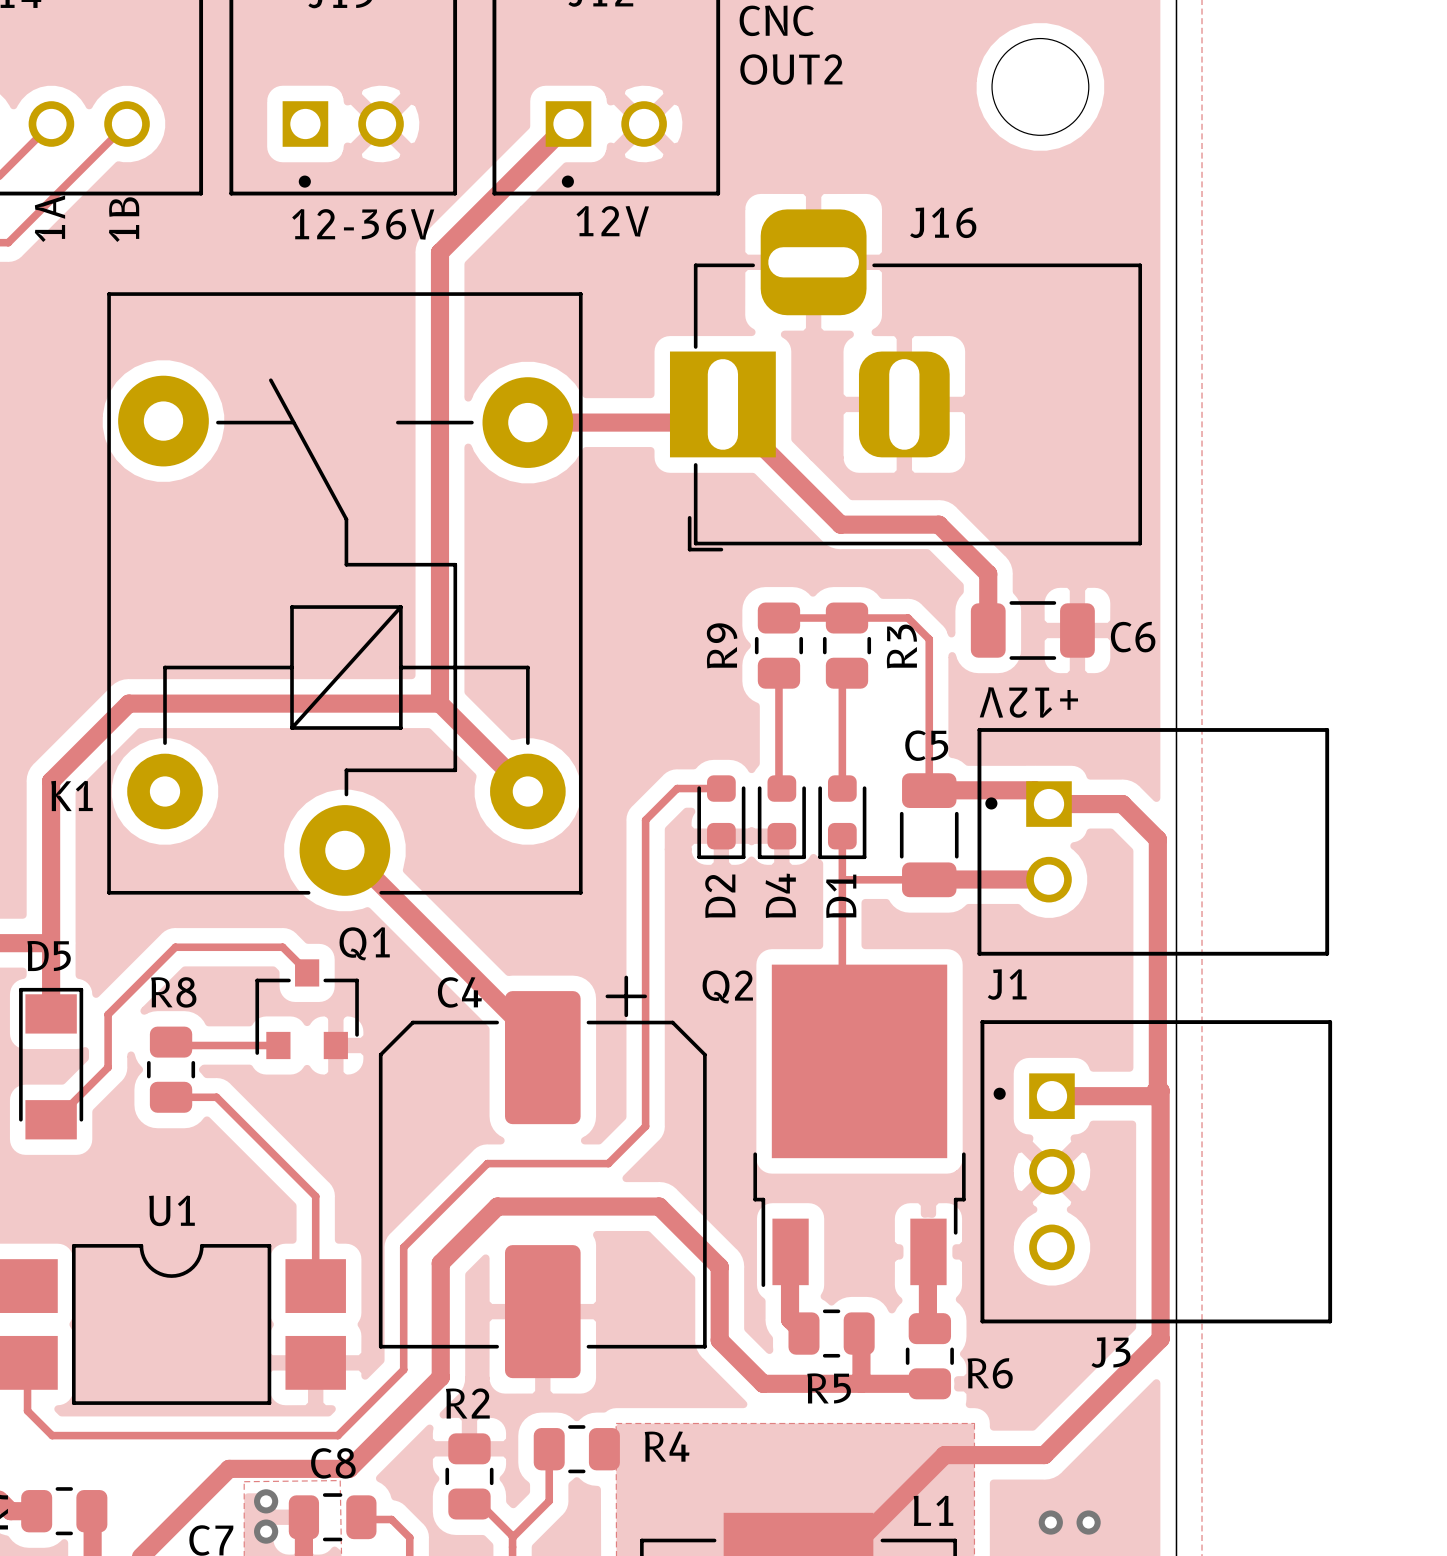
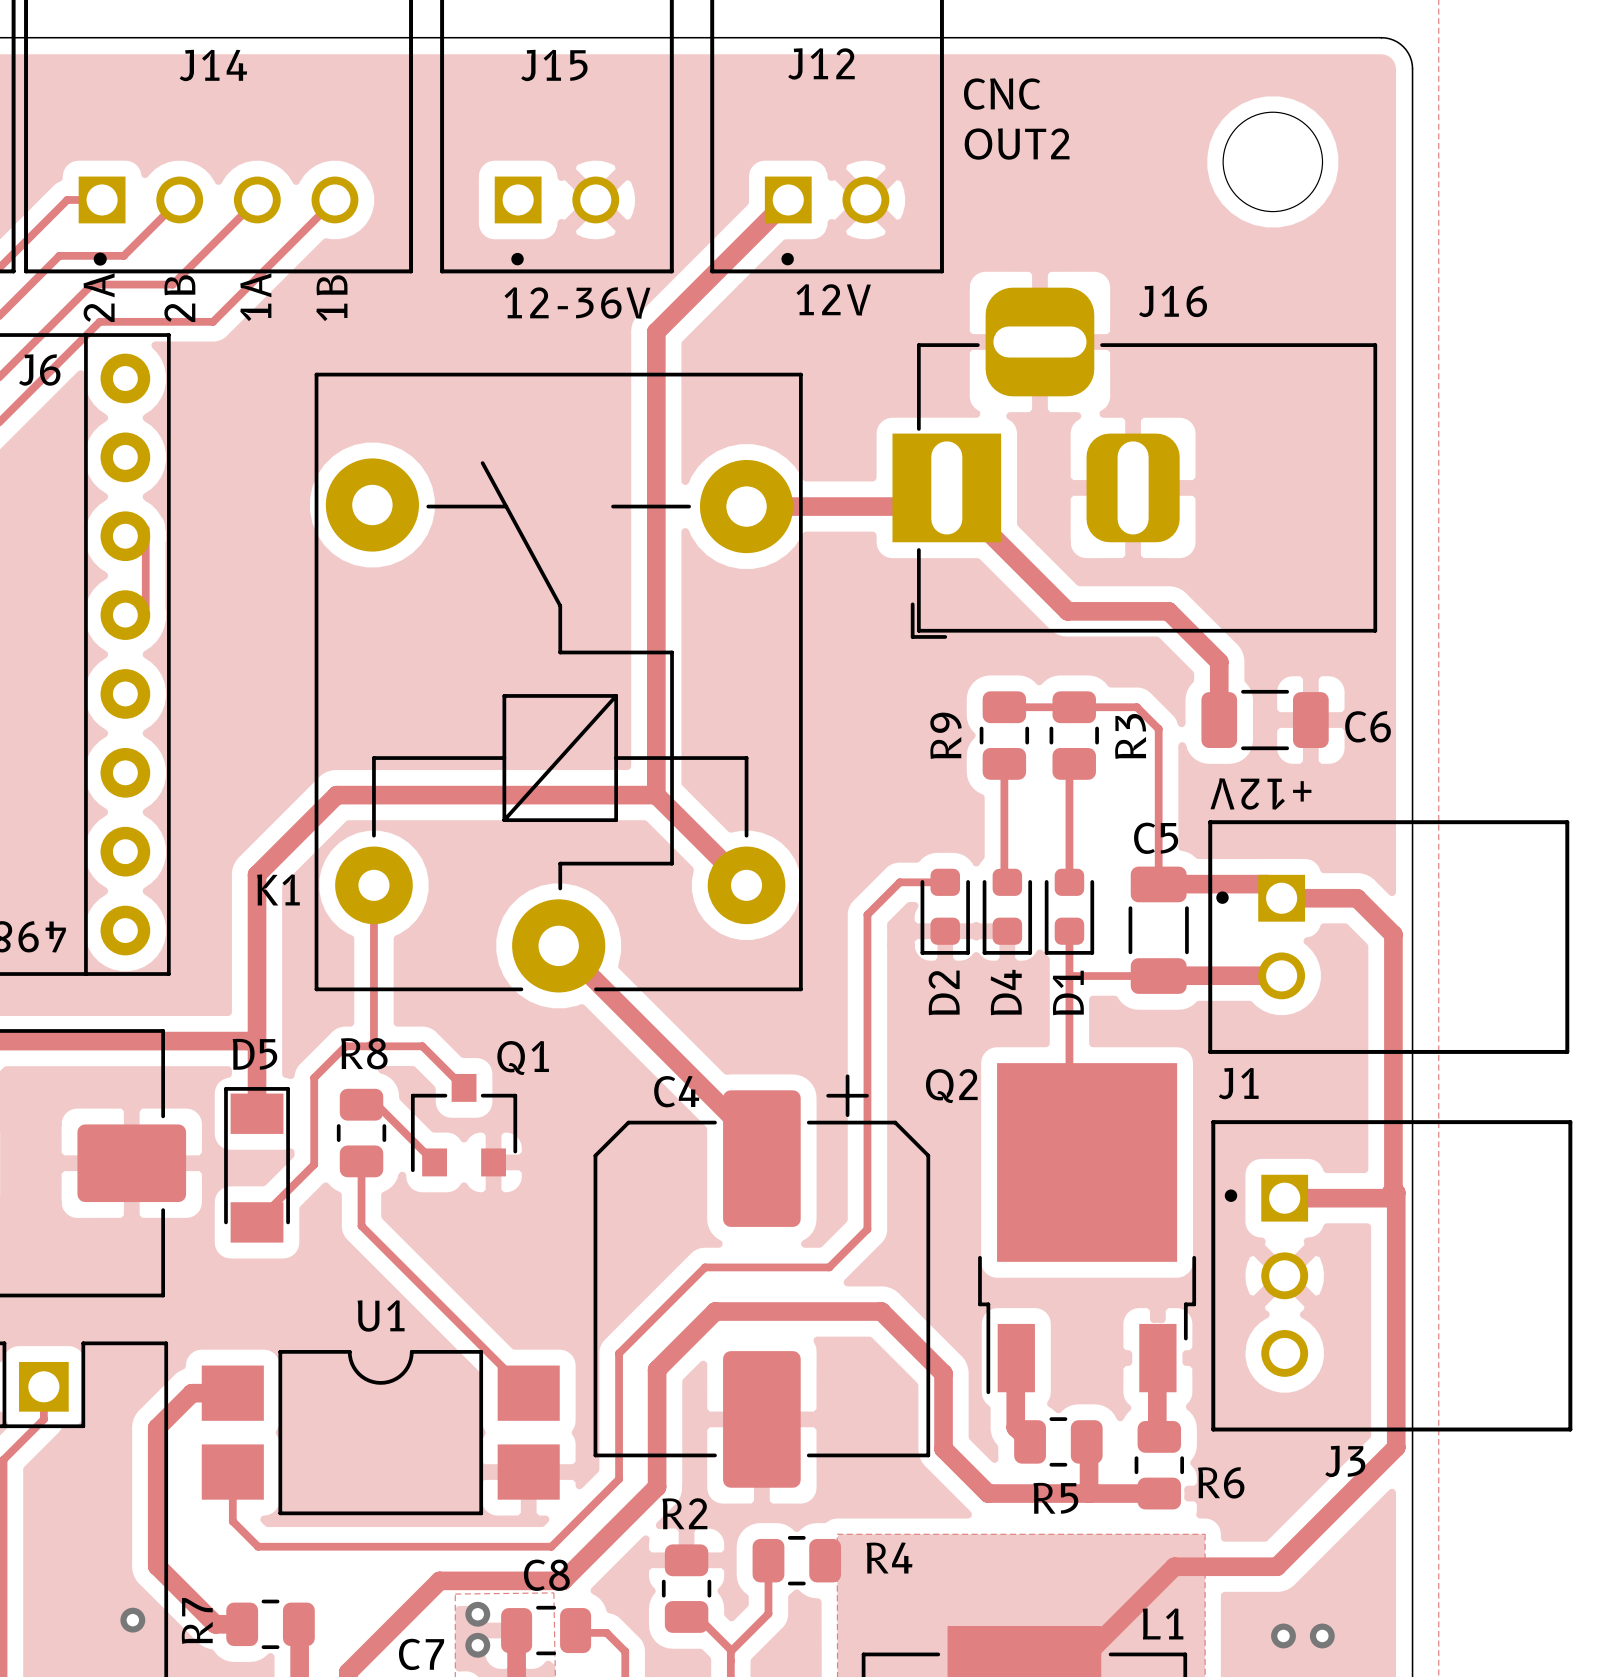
track: none -> (373, 885) (373, 1041) (369, 1046)
track: (307, 972) (282, 947) (175, 947) (108, 1014) (108, 1067) (55, 1119) (51, 1119) -> (464, 1087) (422, 1046) (345, 1046) (314, 1077) (314, 1164) (257, 1222)
track: none -> (361, 1104) (376, 1104) (434, 1162)
Q1 position: (307, 1009) -> (464, 1125)
track: (175, 1039) (171, 1042) (174, 1045) (278, 1045) (275, 1039) -> none
R8 position: (171, 1069) -> (361, 1133)
track: (171, 1097) (216, 1097) (315, 1196) (315, 1286) -> (361, 1161) (361, 1226) (528, 1393)

